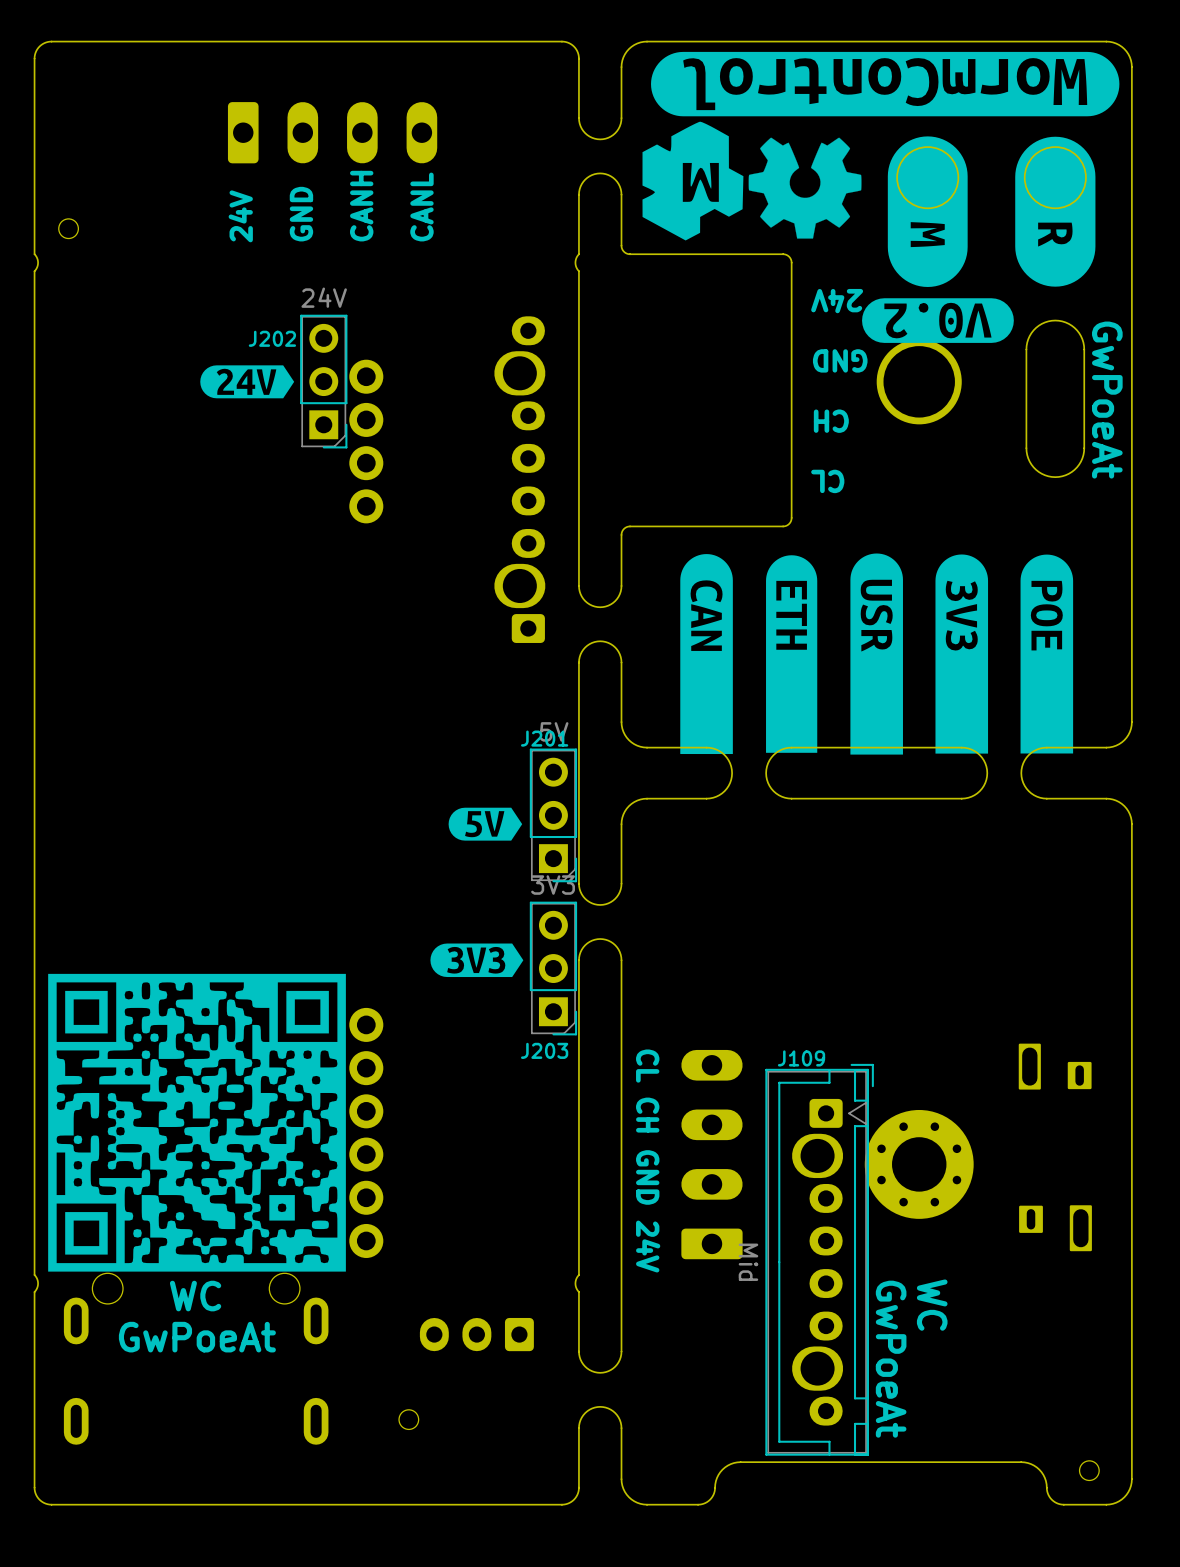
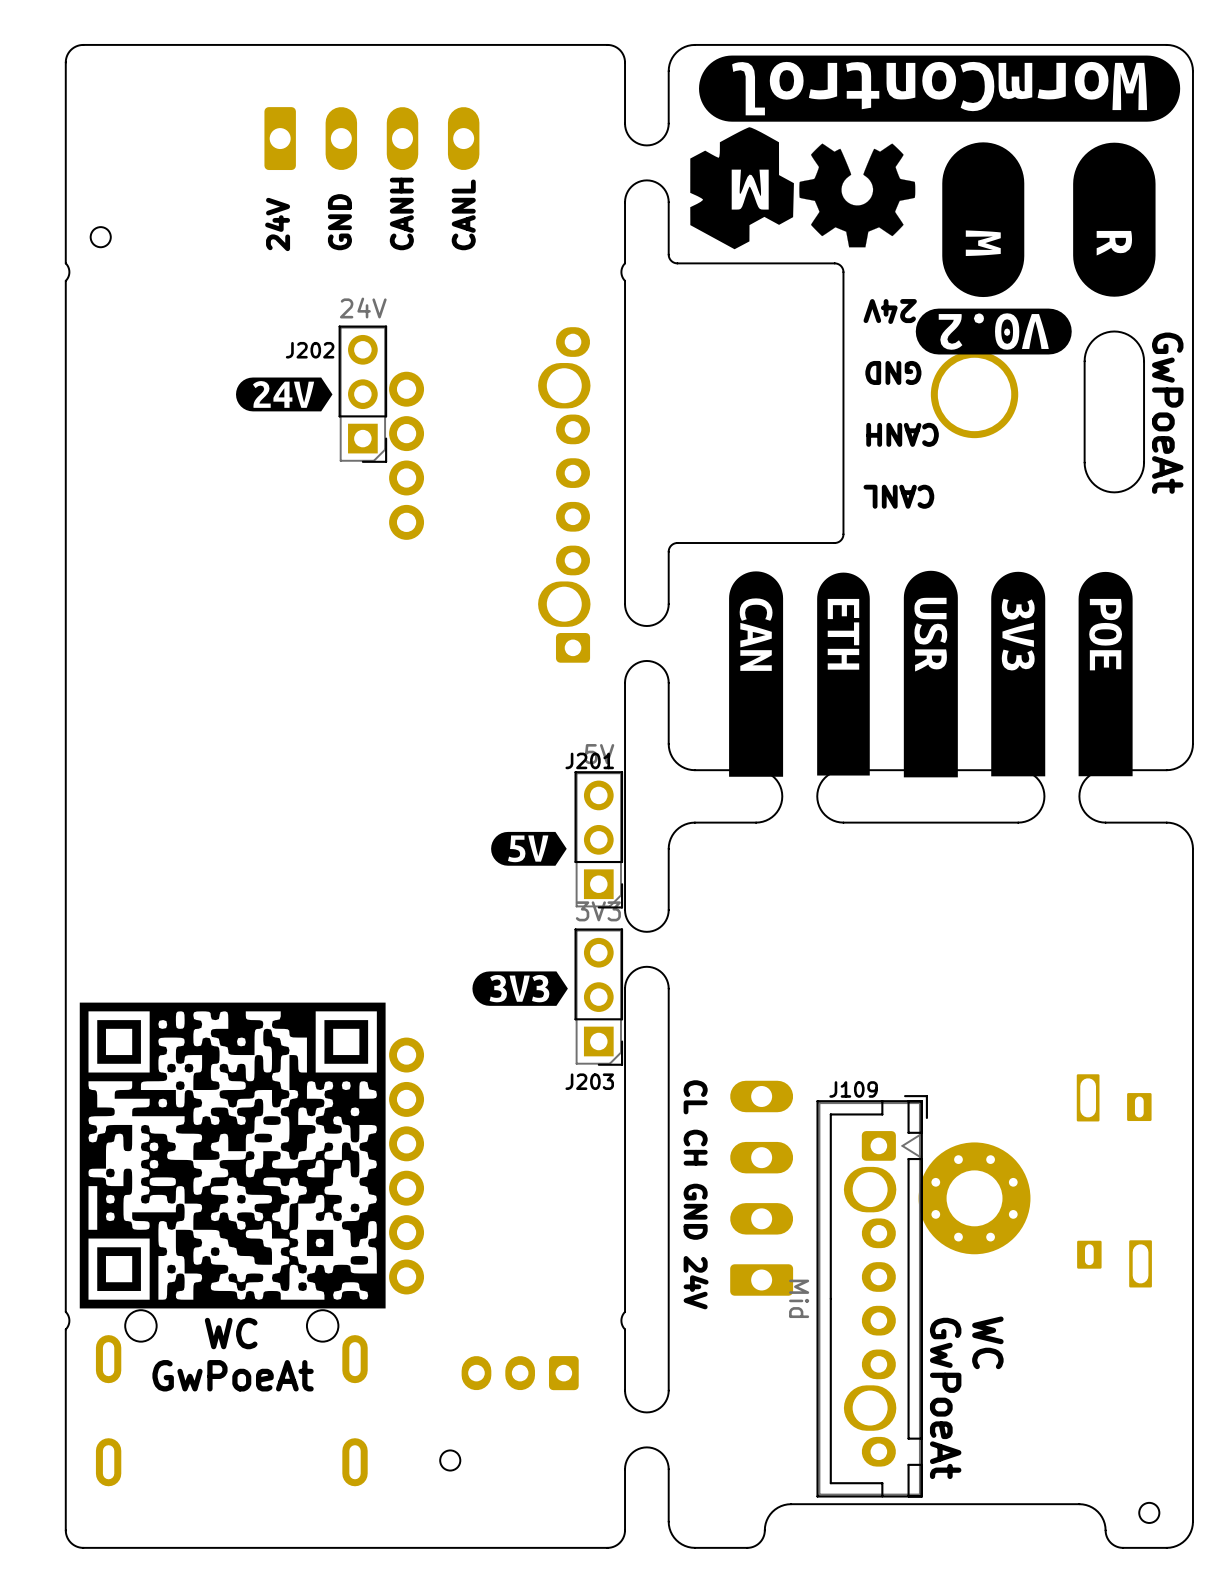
text: CH (831, 421) -> CANH (902, 434)
text: CL (827, 481) -> CANL (898, 496)

